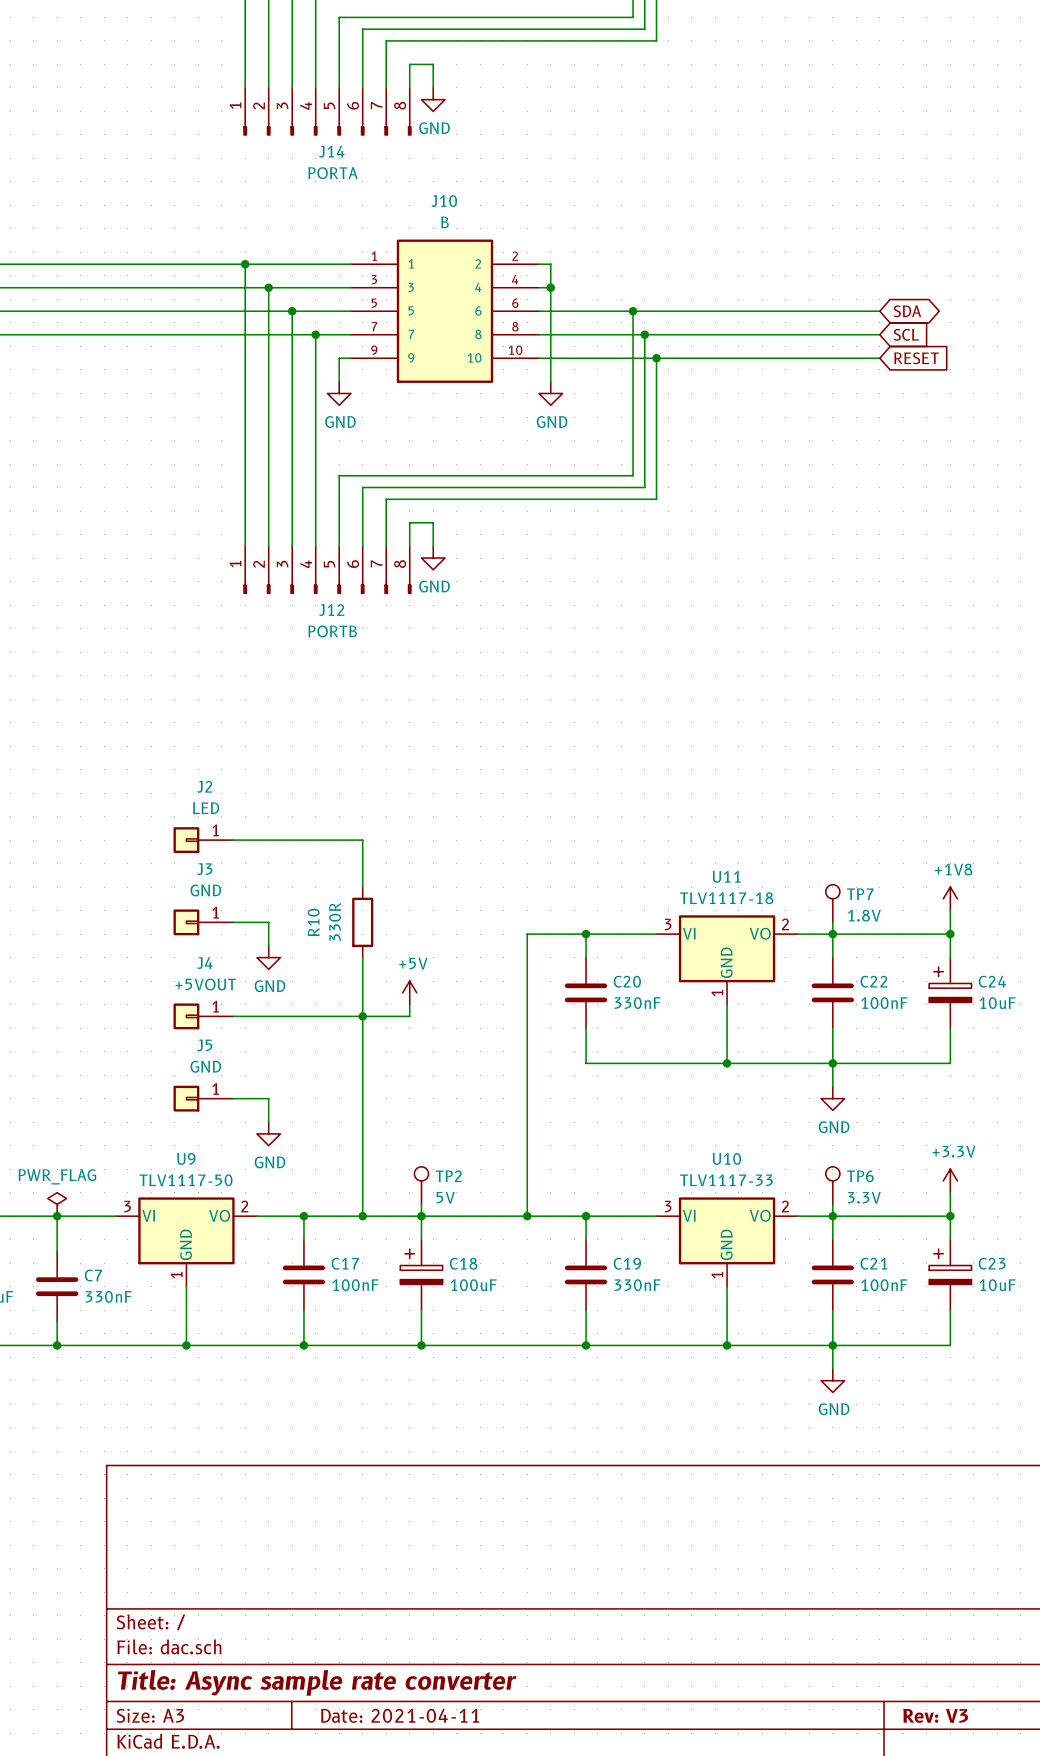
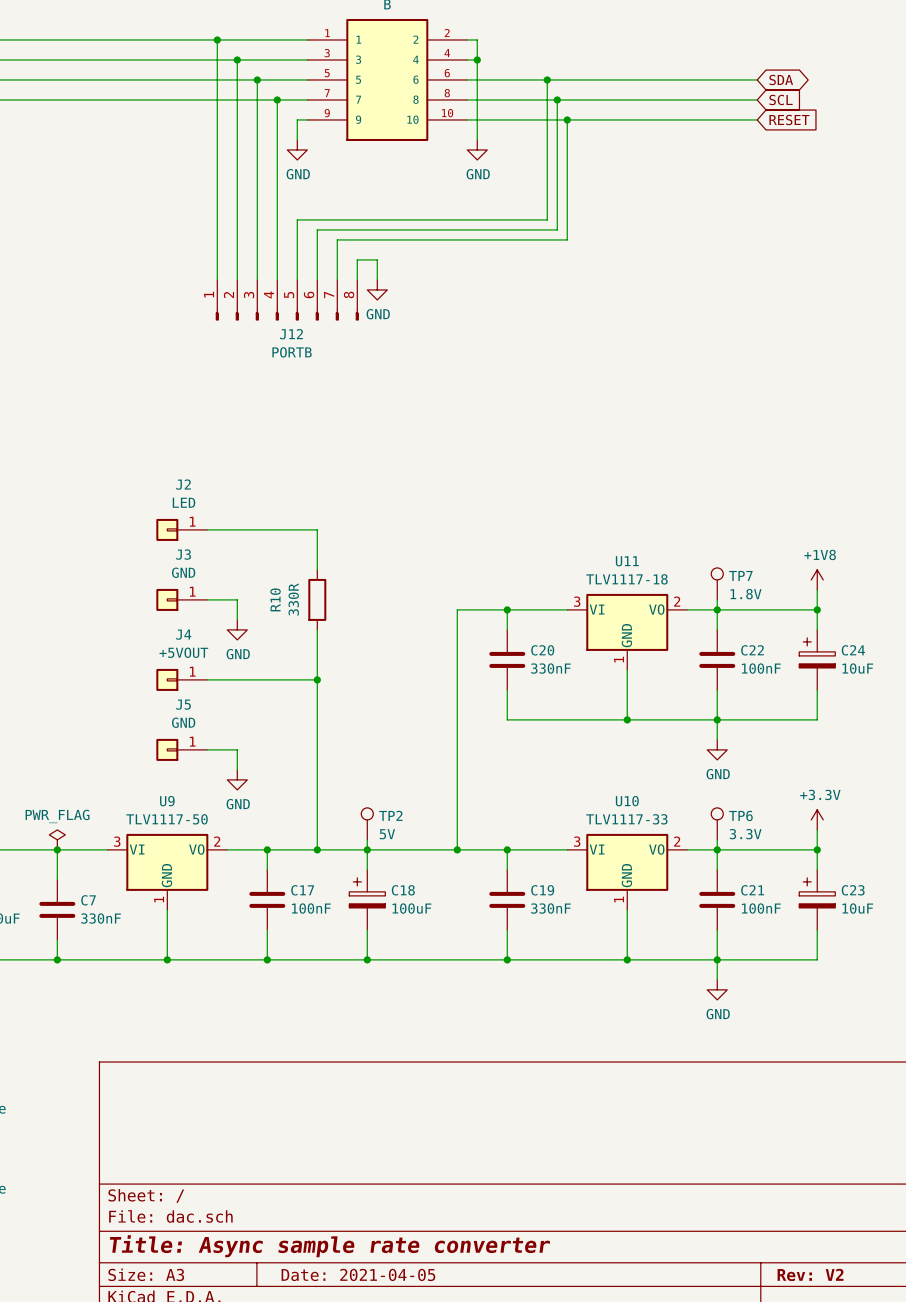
power symbol: +5V (409, 992) -> none
wire: (409, 1004) (409, 1016) (362, 1016) -> none
title block: Date: 2021-04-11 (400, 1715) -> Date: 2021-04-05 (358, 1274)
title block: Rev: V3 (935, 1715) -> Rev: V2 (810, 1274)

